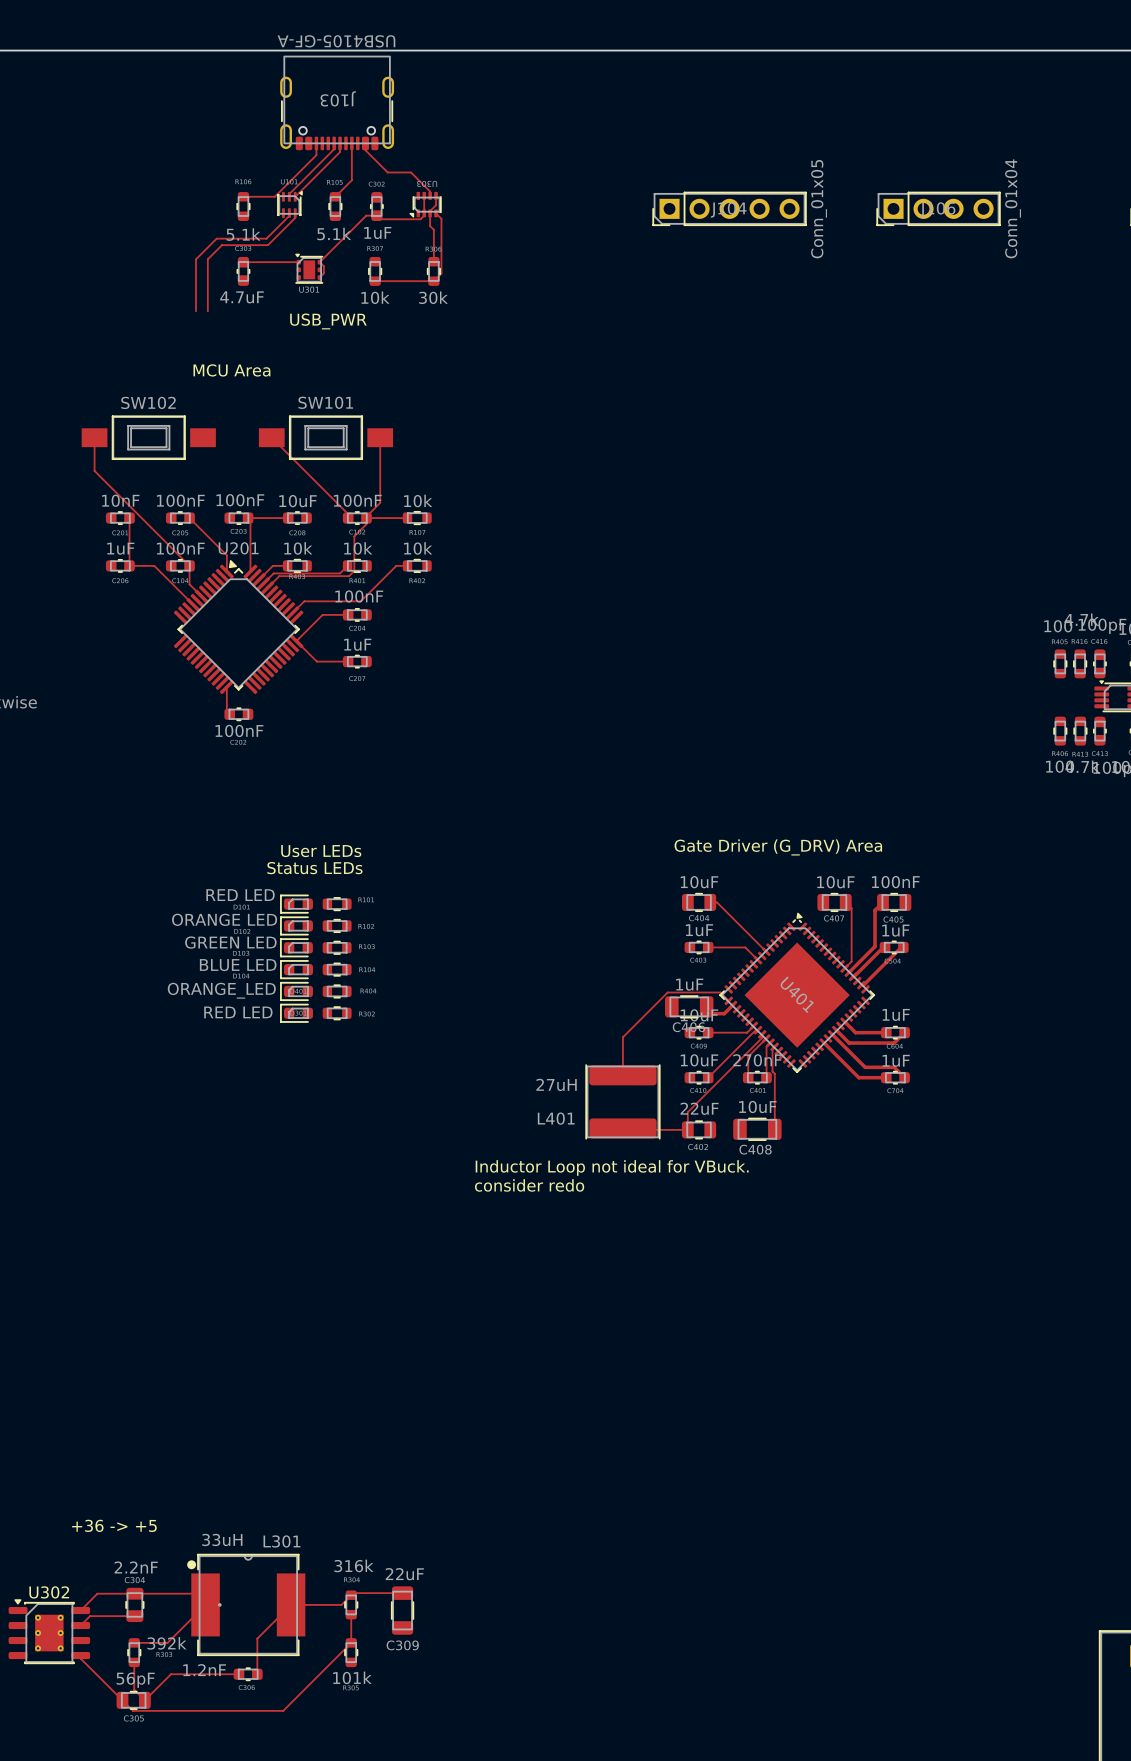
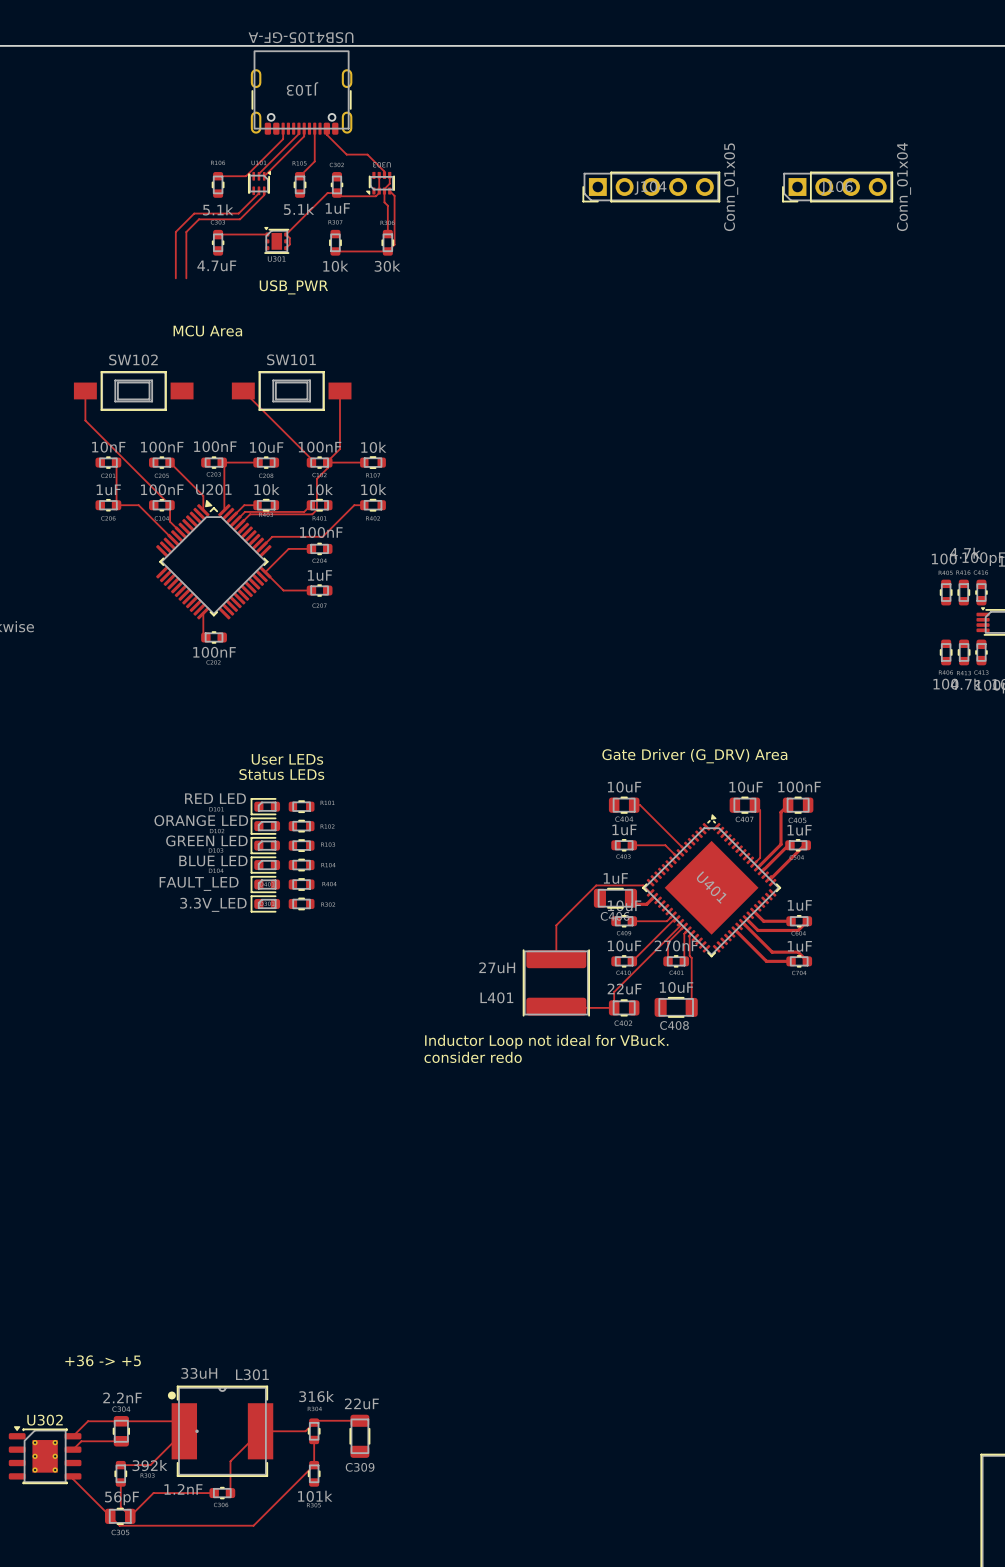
part value: ORANGE_LED (221, 990) -> FAULT_LED (199, 883)
part value: RED LED (238, 1012) -> 3.3V_LED (213, 904)

